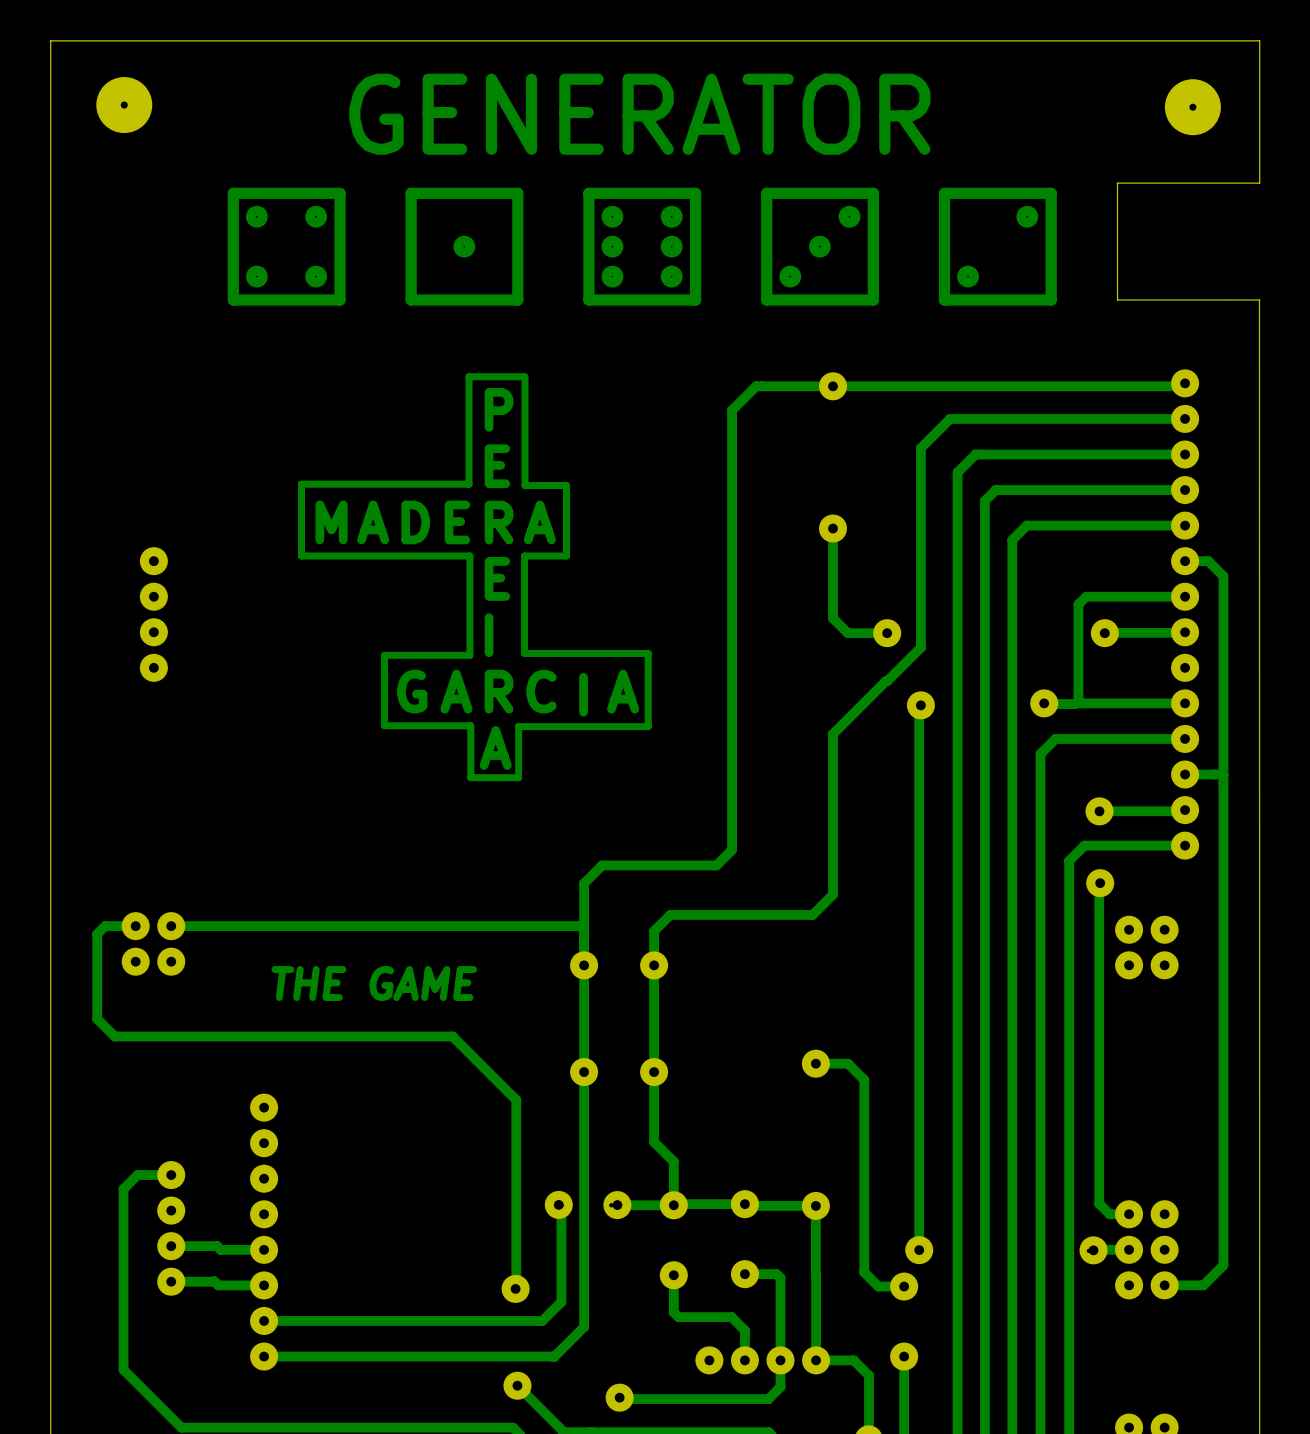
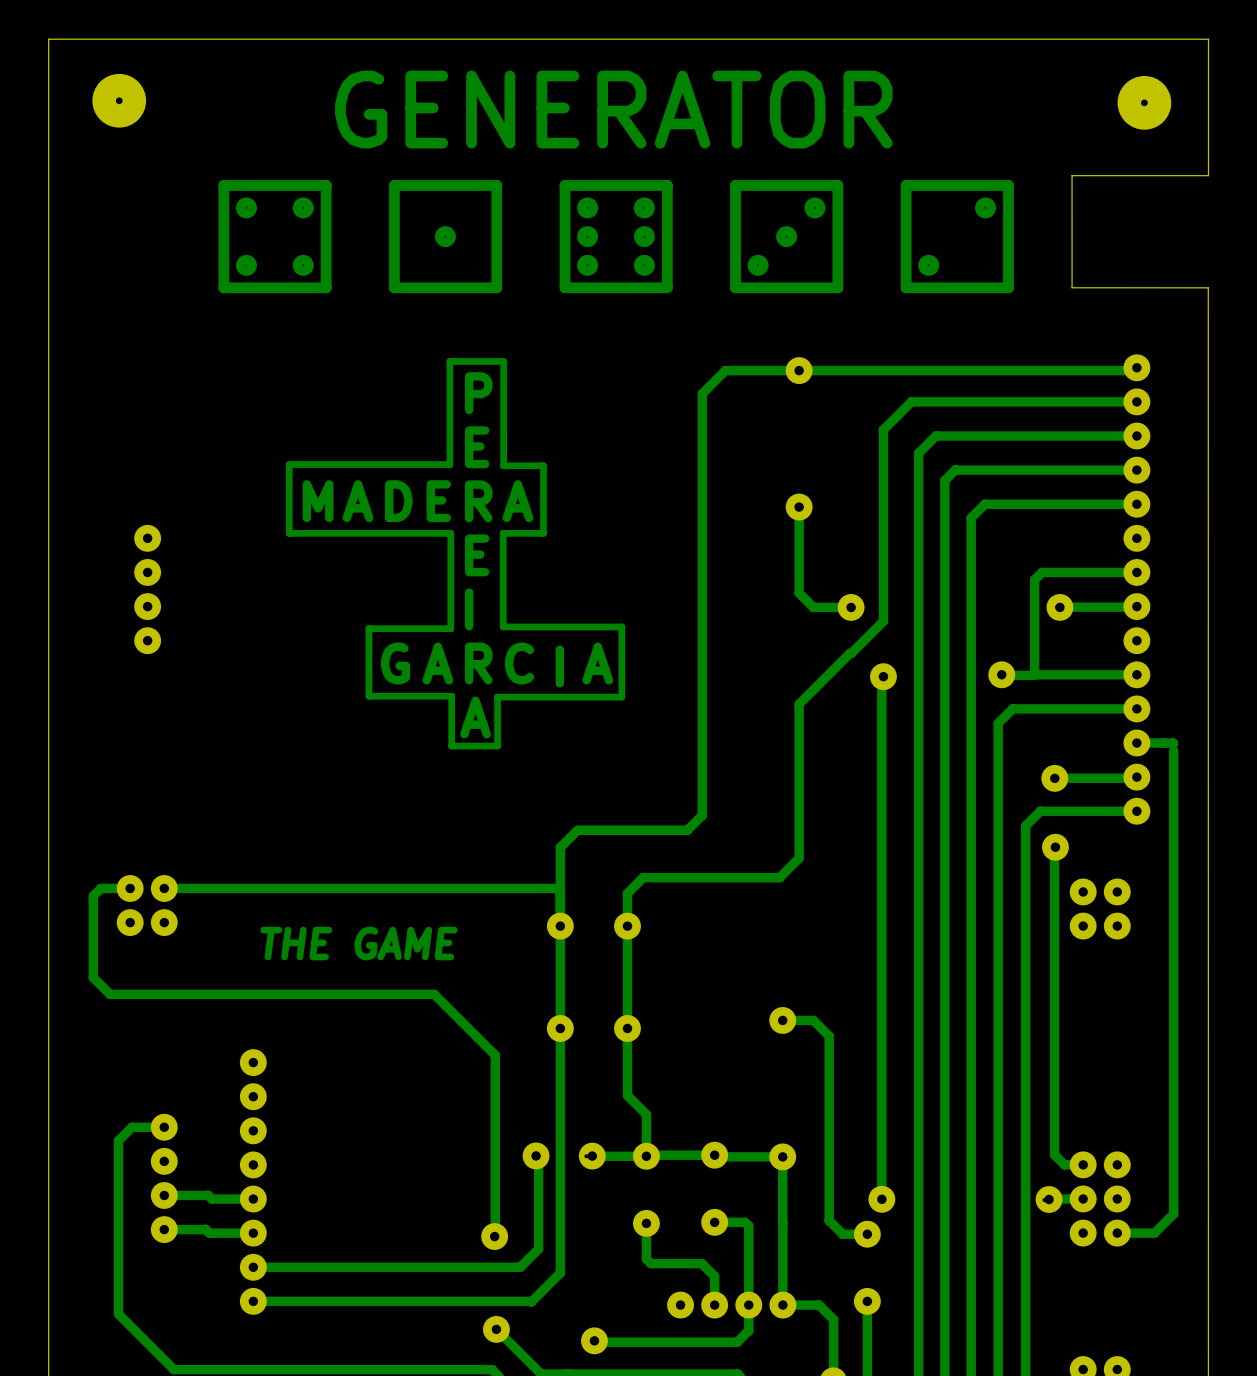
track: (1185, 561) (1208, 561) (1223, 576) (1223, 782) -> none

